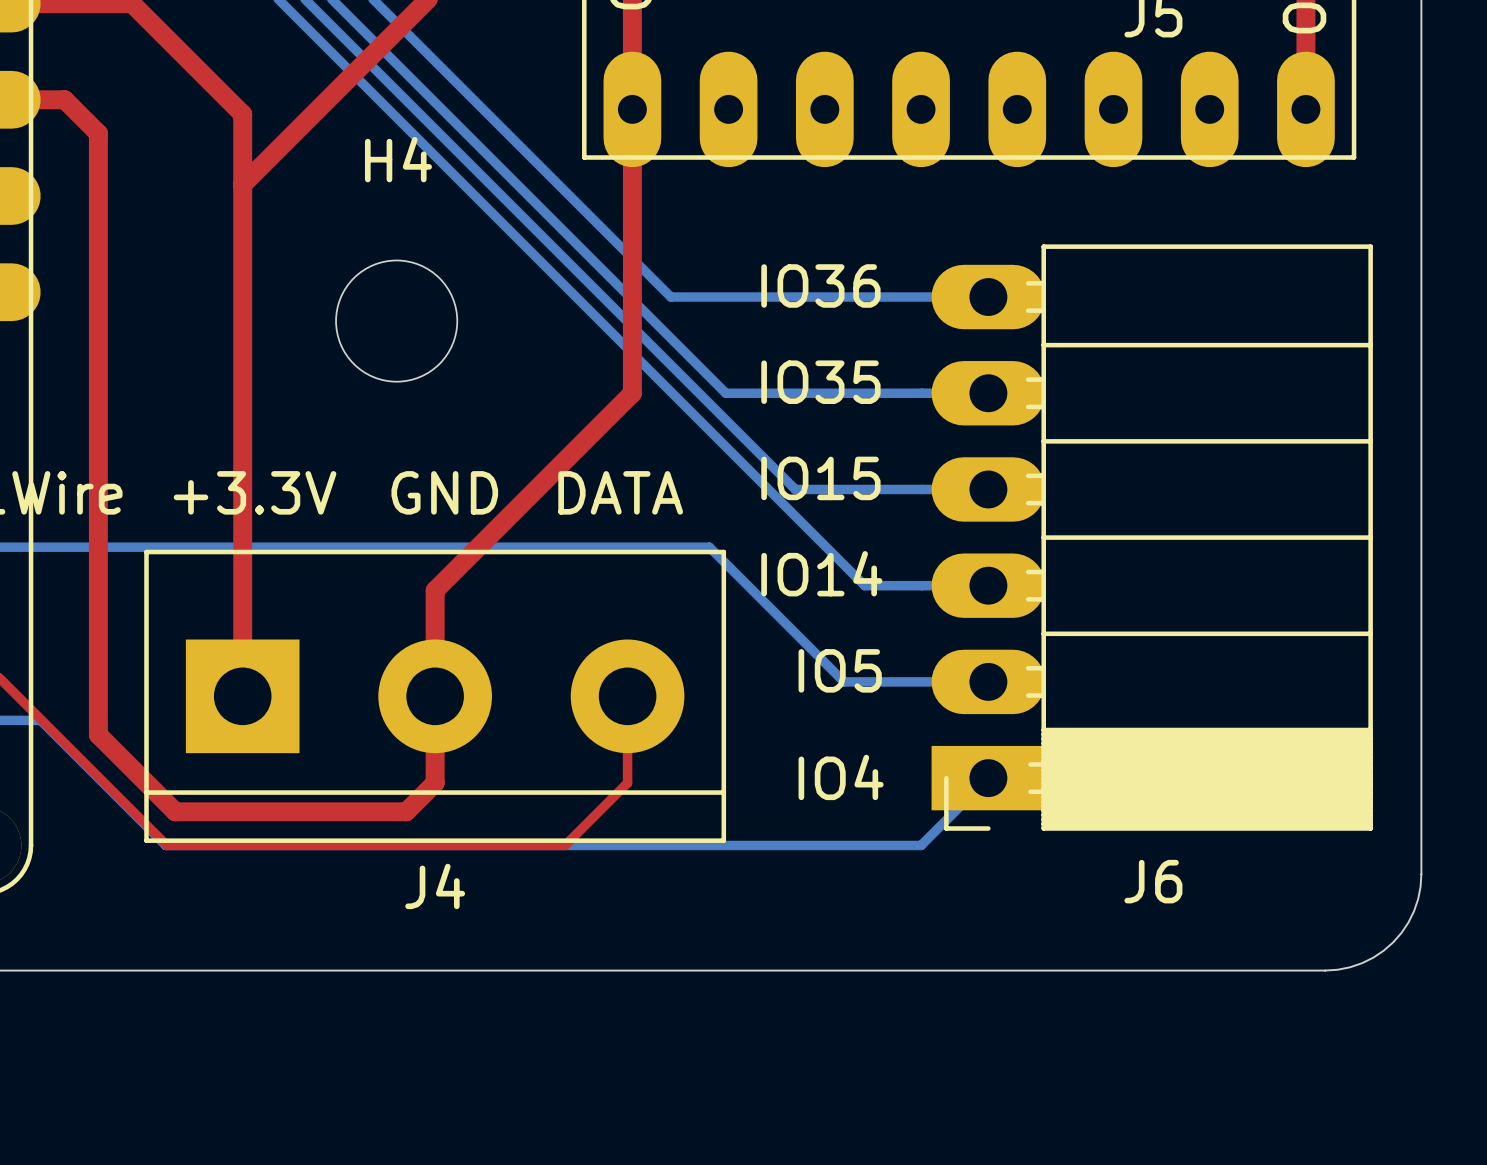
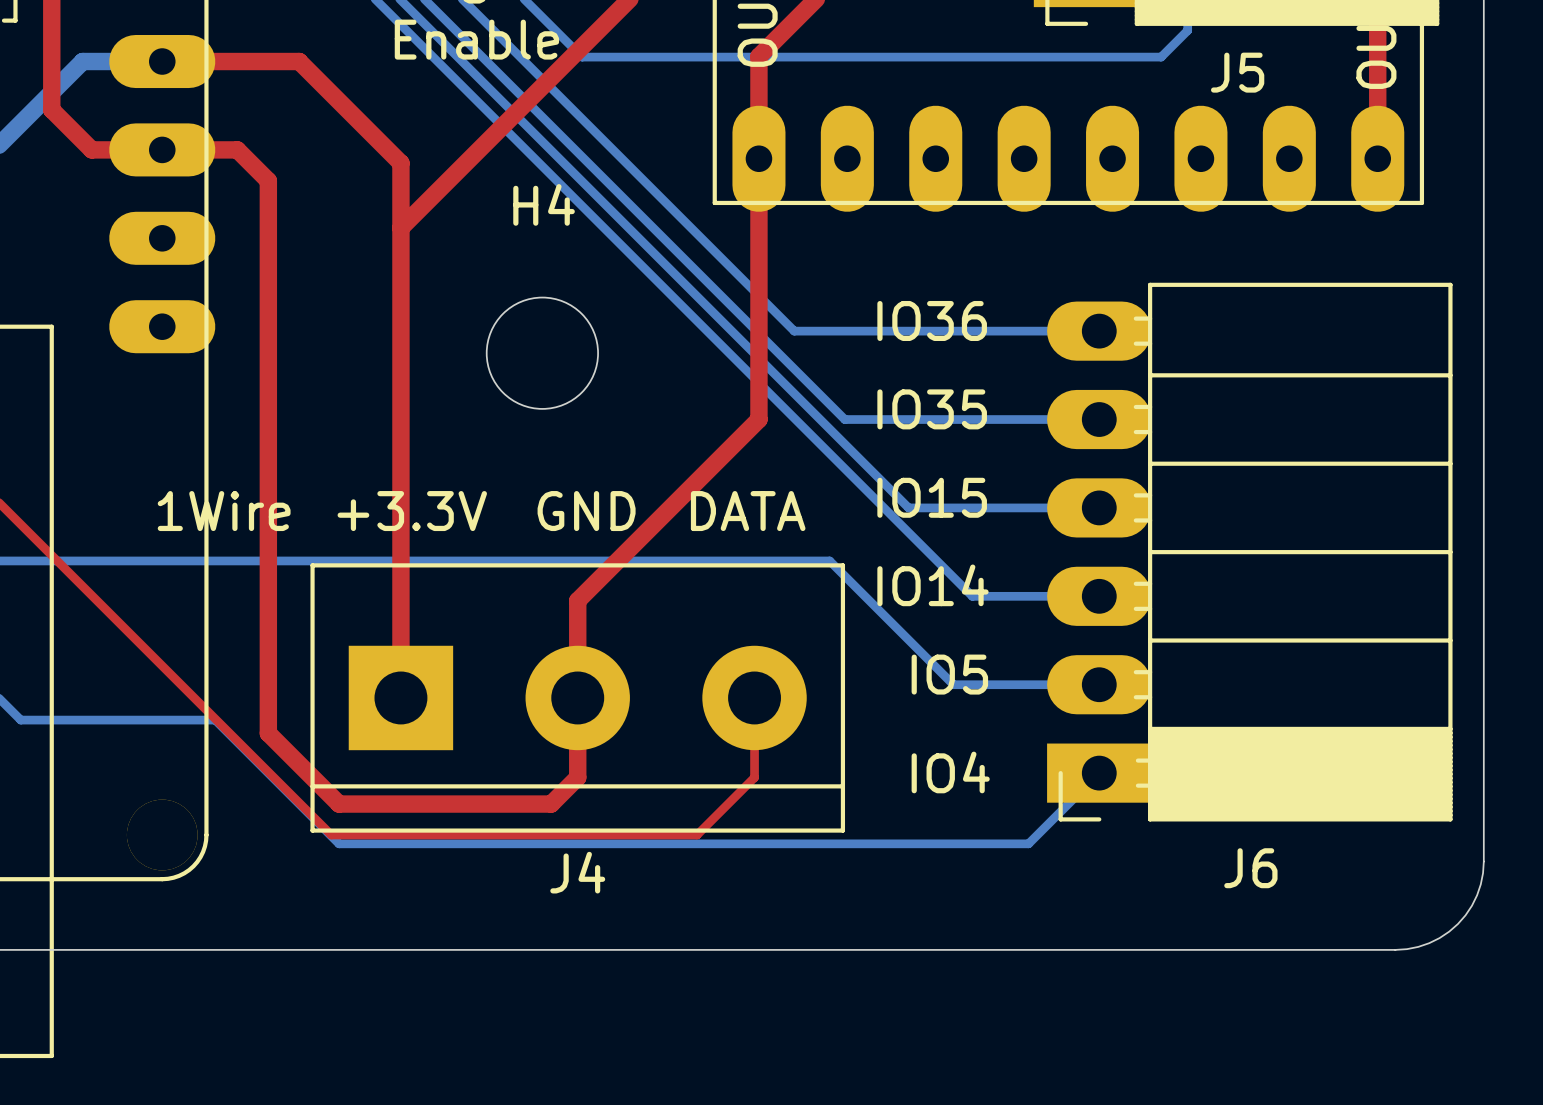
J6 position: (1152, 537) -> (1249, 552)
bottom track: (988, 778) (921, 845) (165, 845) -> (1099, 773) (1028, 843) (339, 843) (330, 834)

